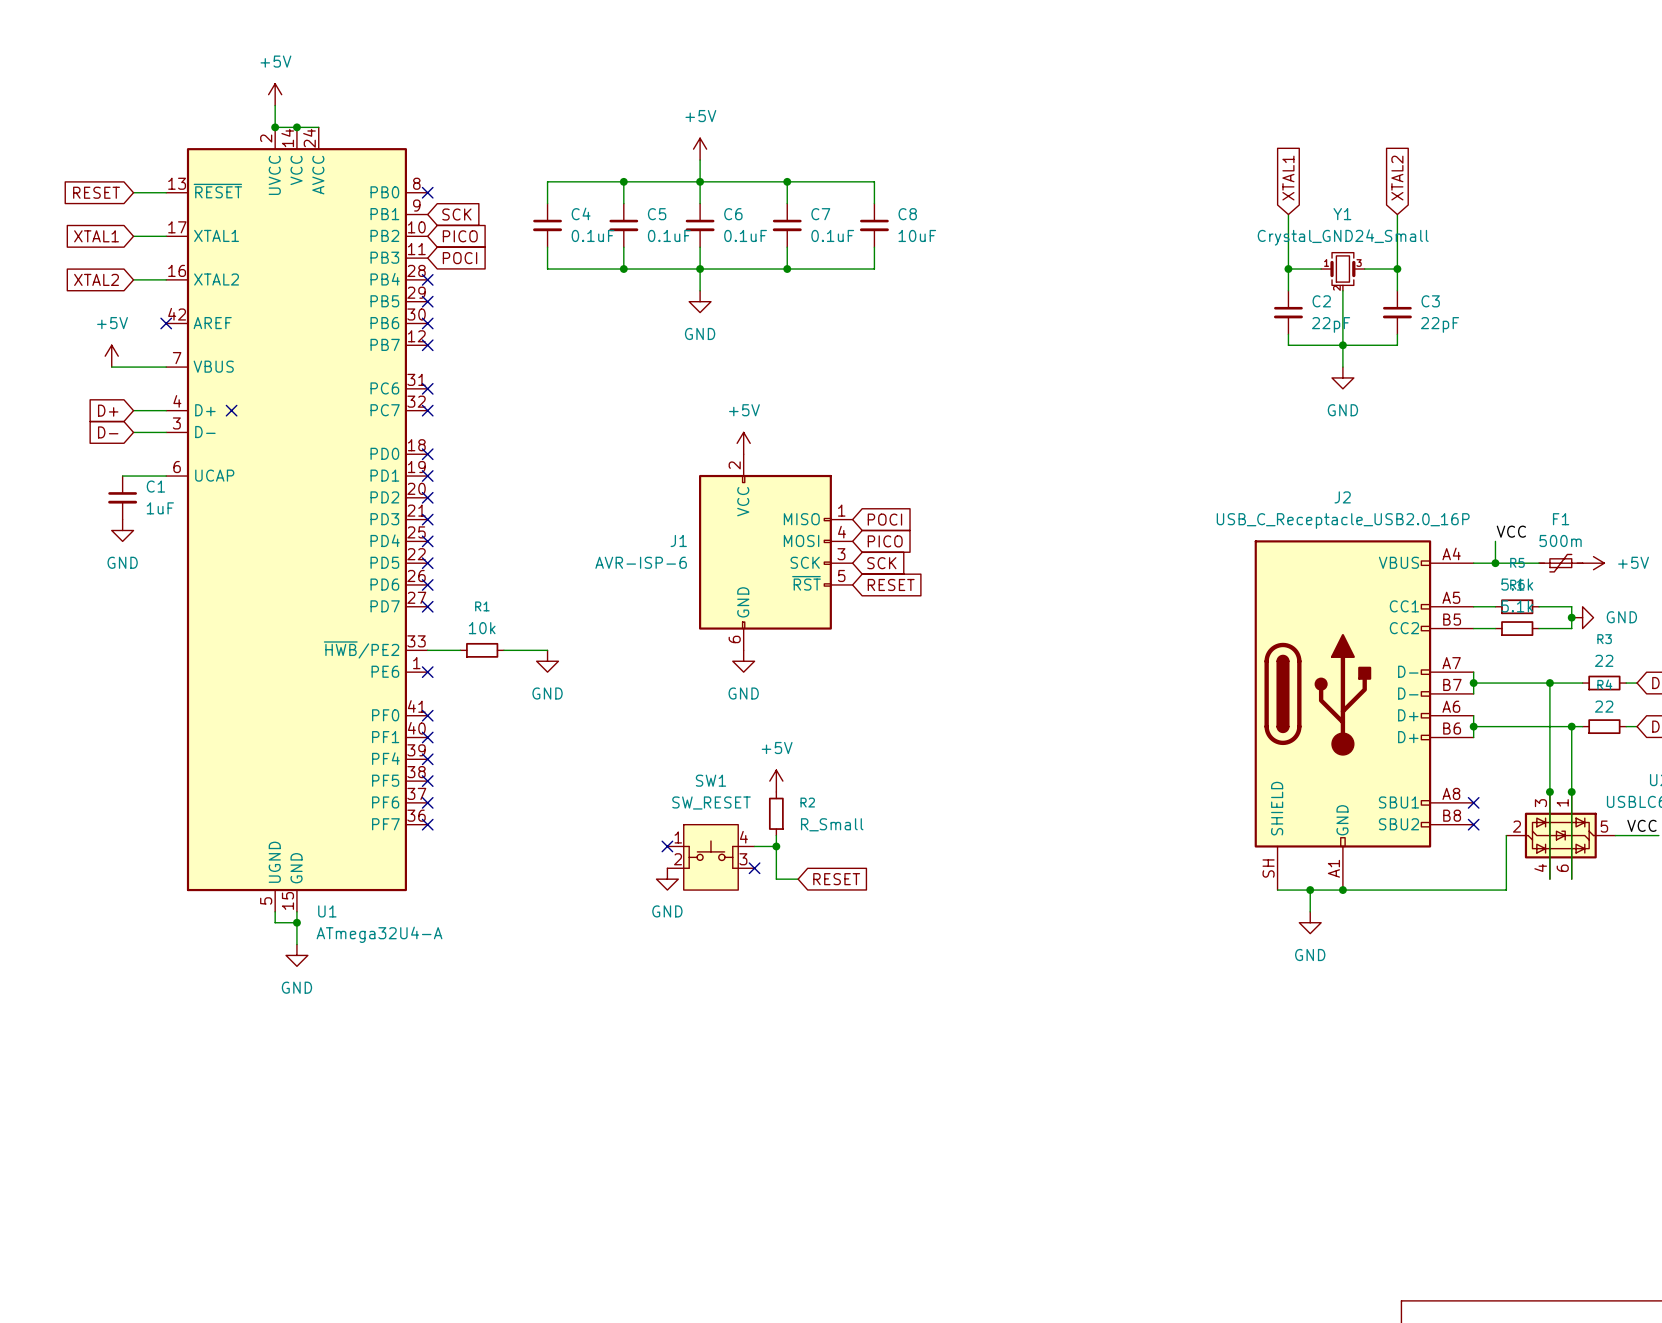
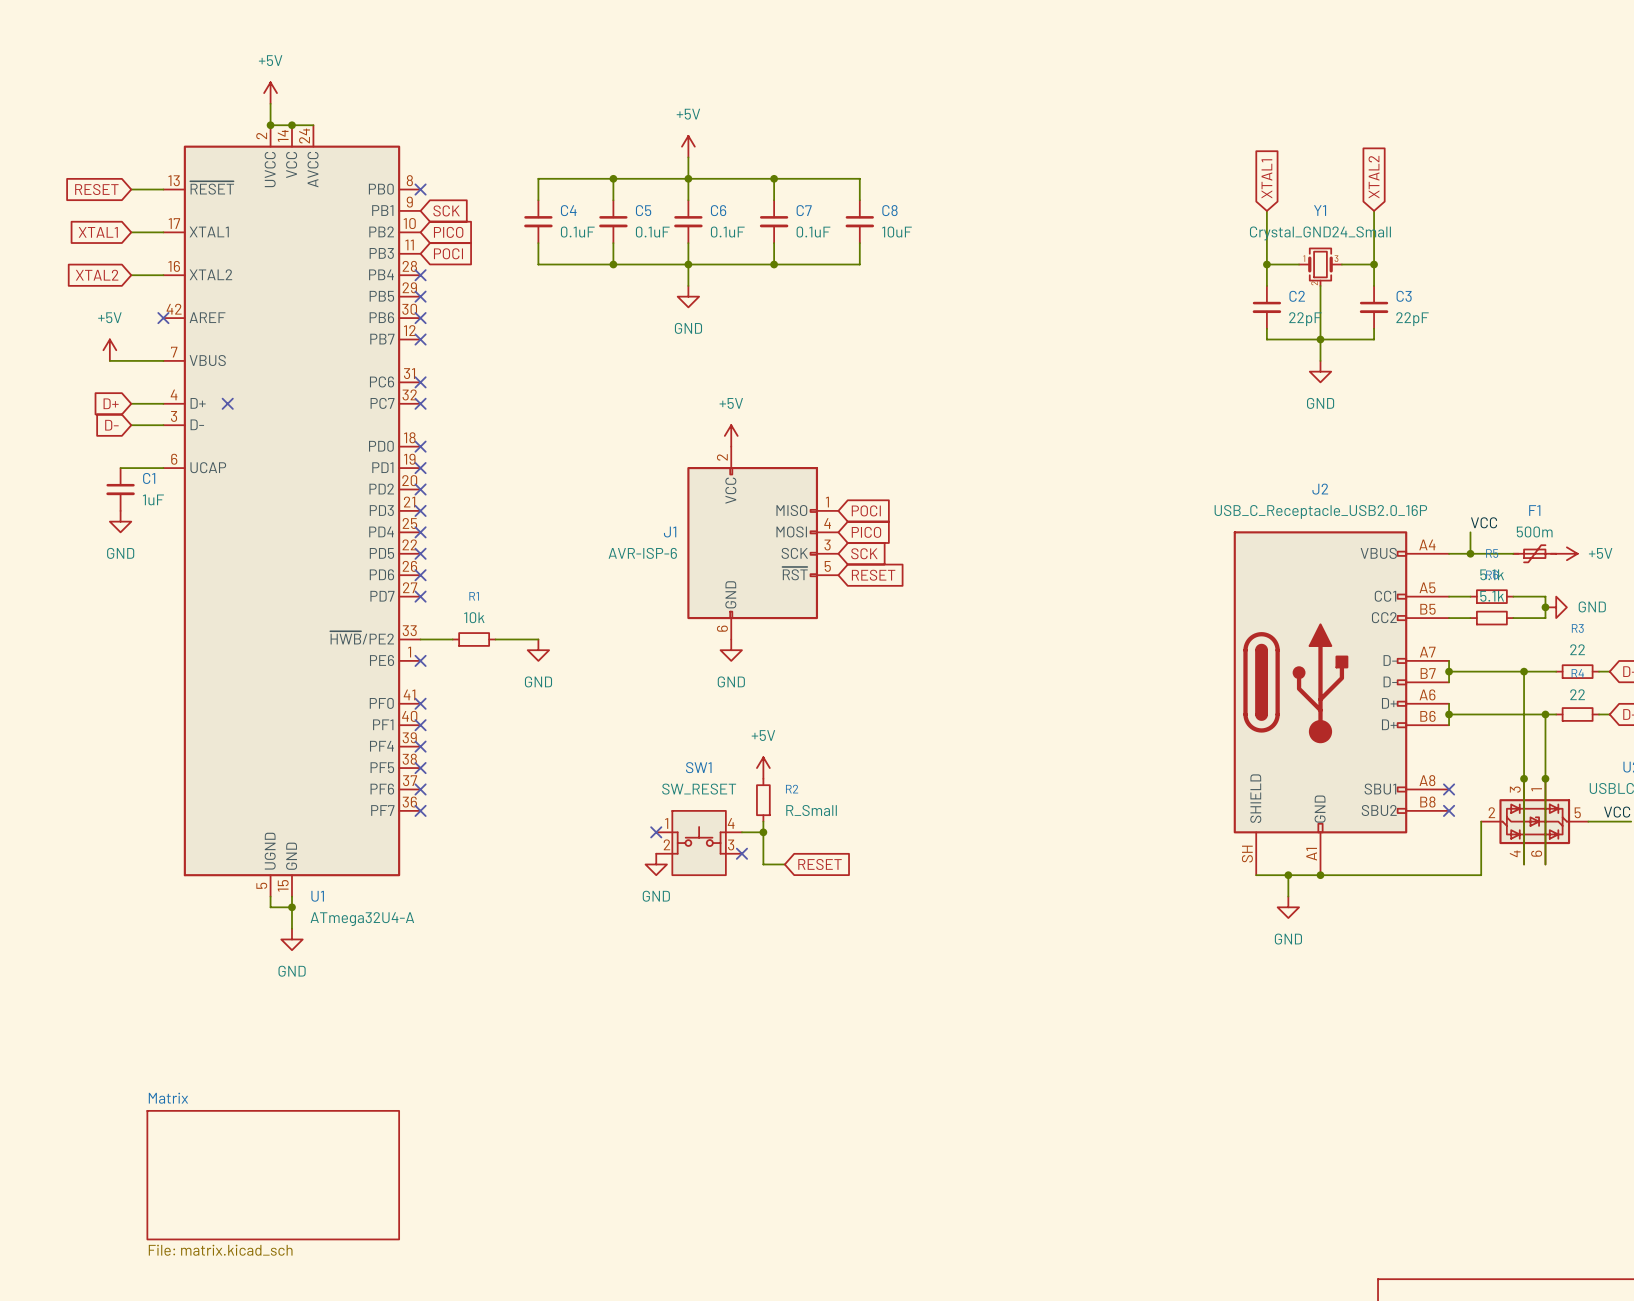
sheet Matrix: none -> File: matrix.kicad_sch (273, 1175)

